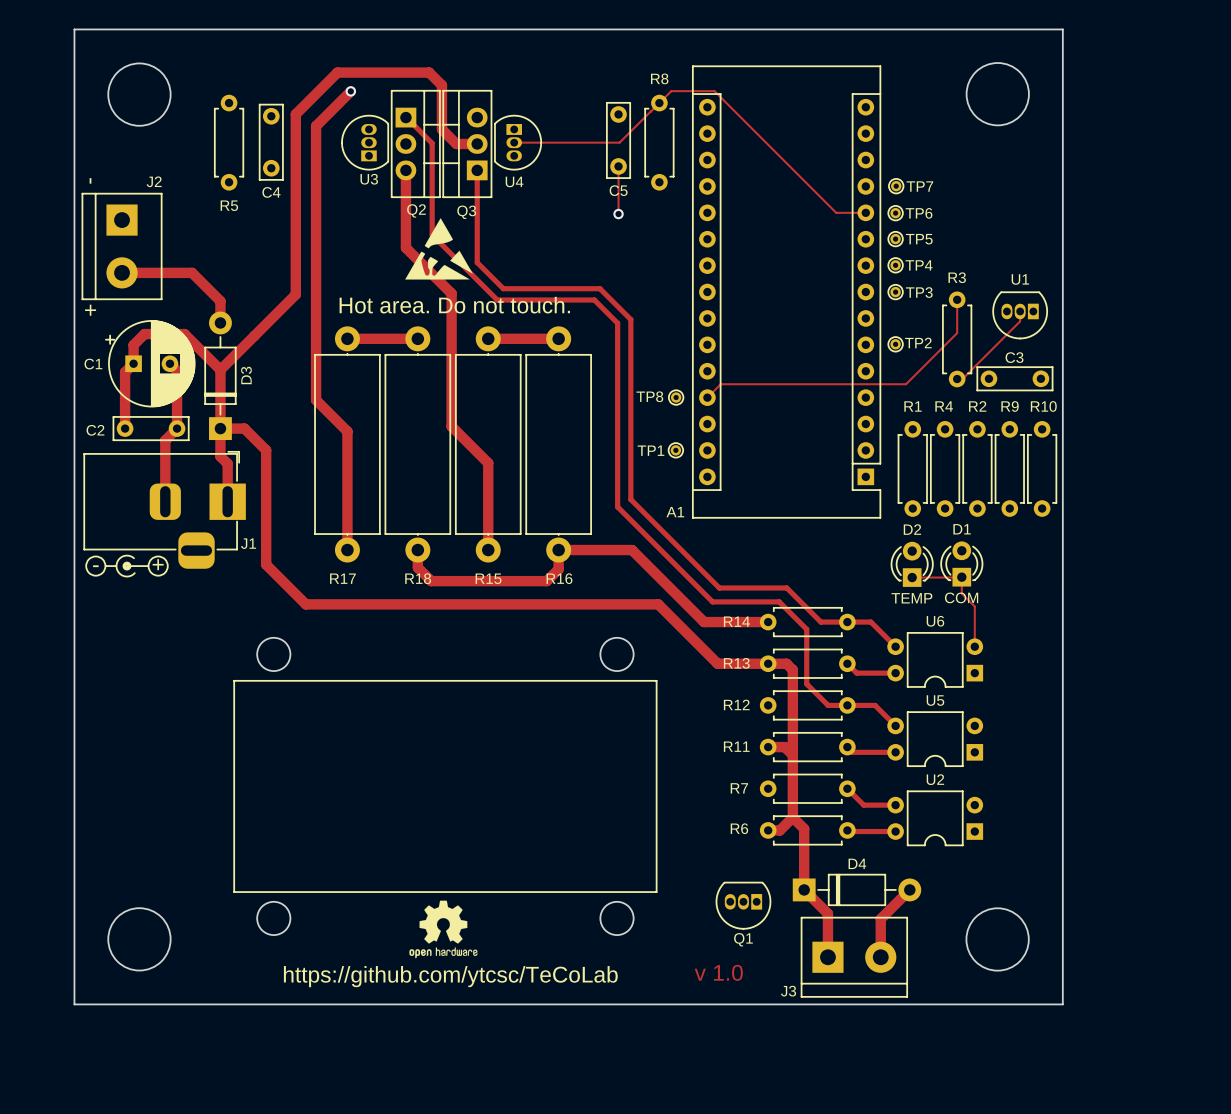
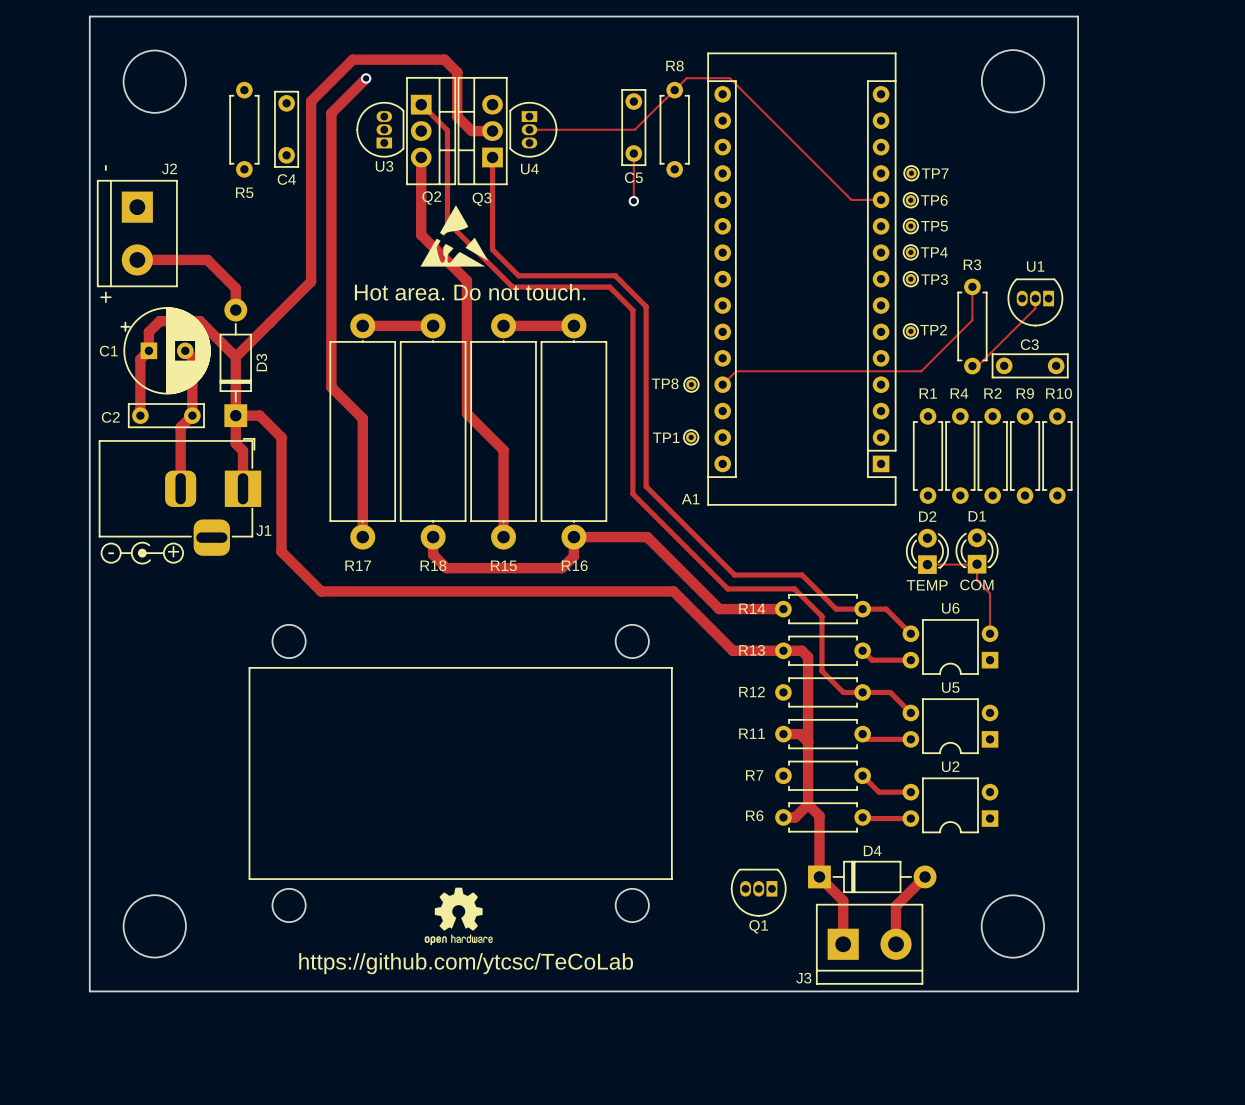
text: v 1.0 (718, 972) -> none

